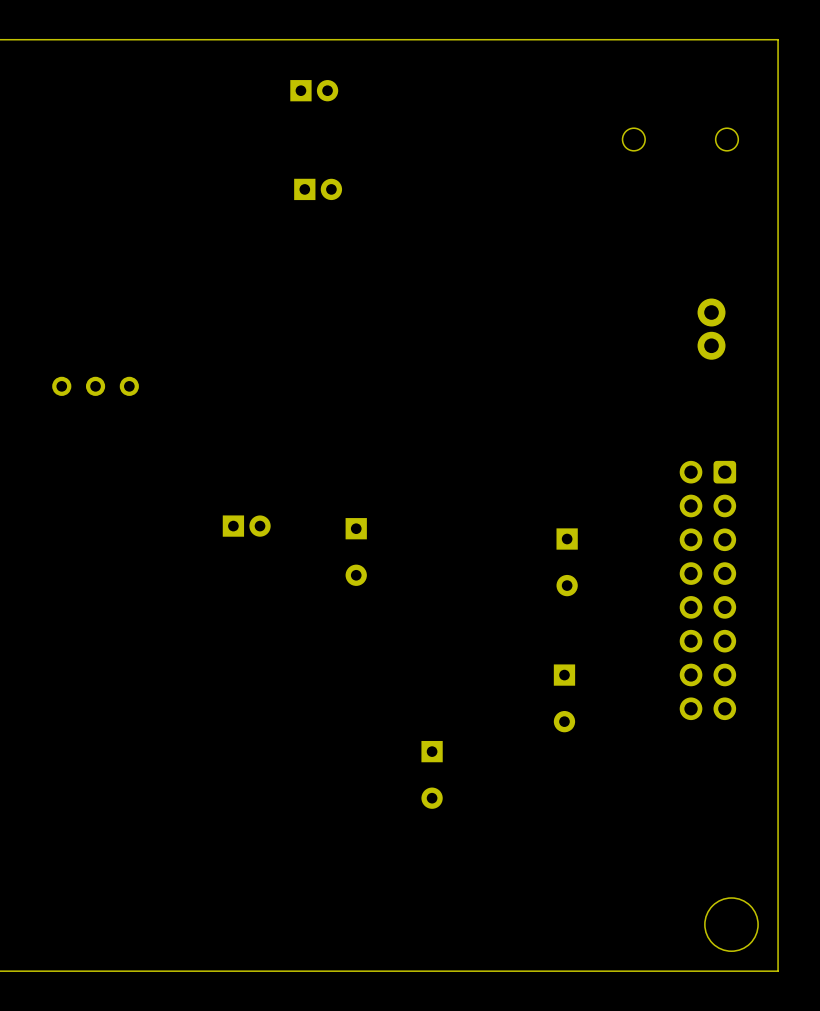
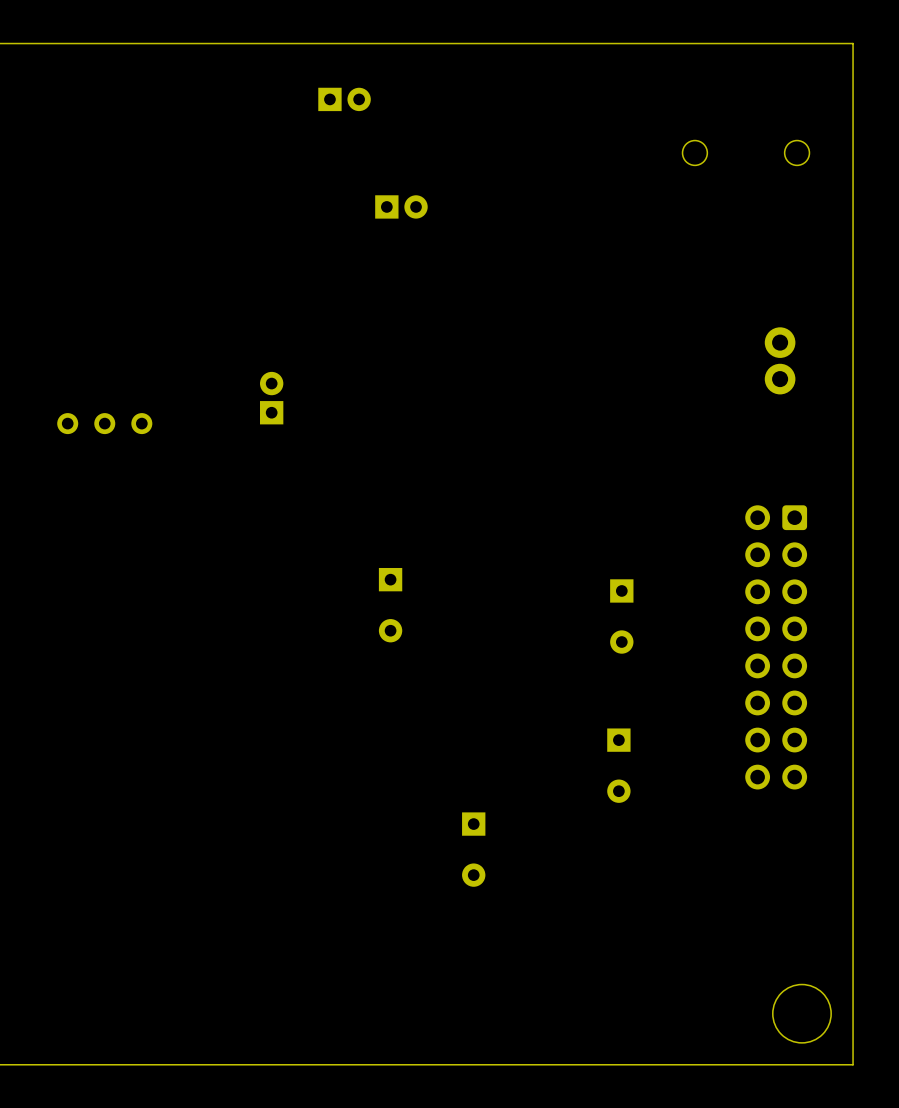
part position: (318, 189) -> (401, 206)
part: none -> (271, 398)
part: (246, 526) -> none

